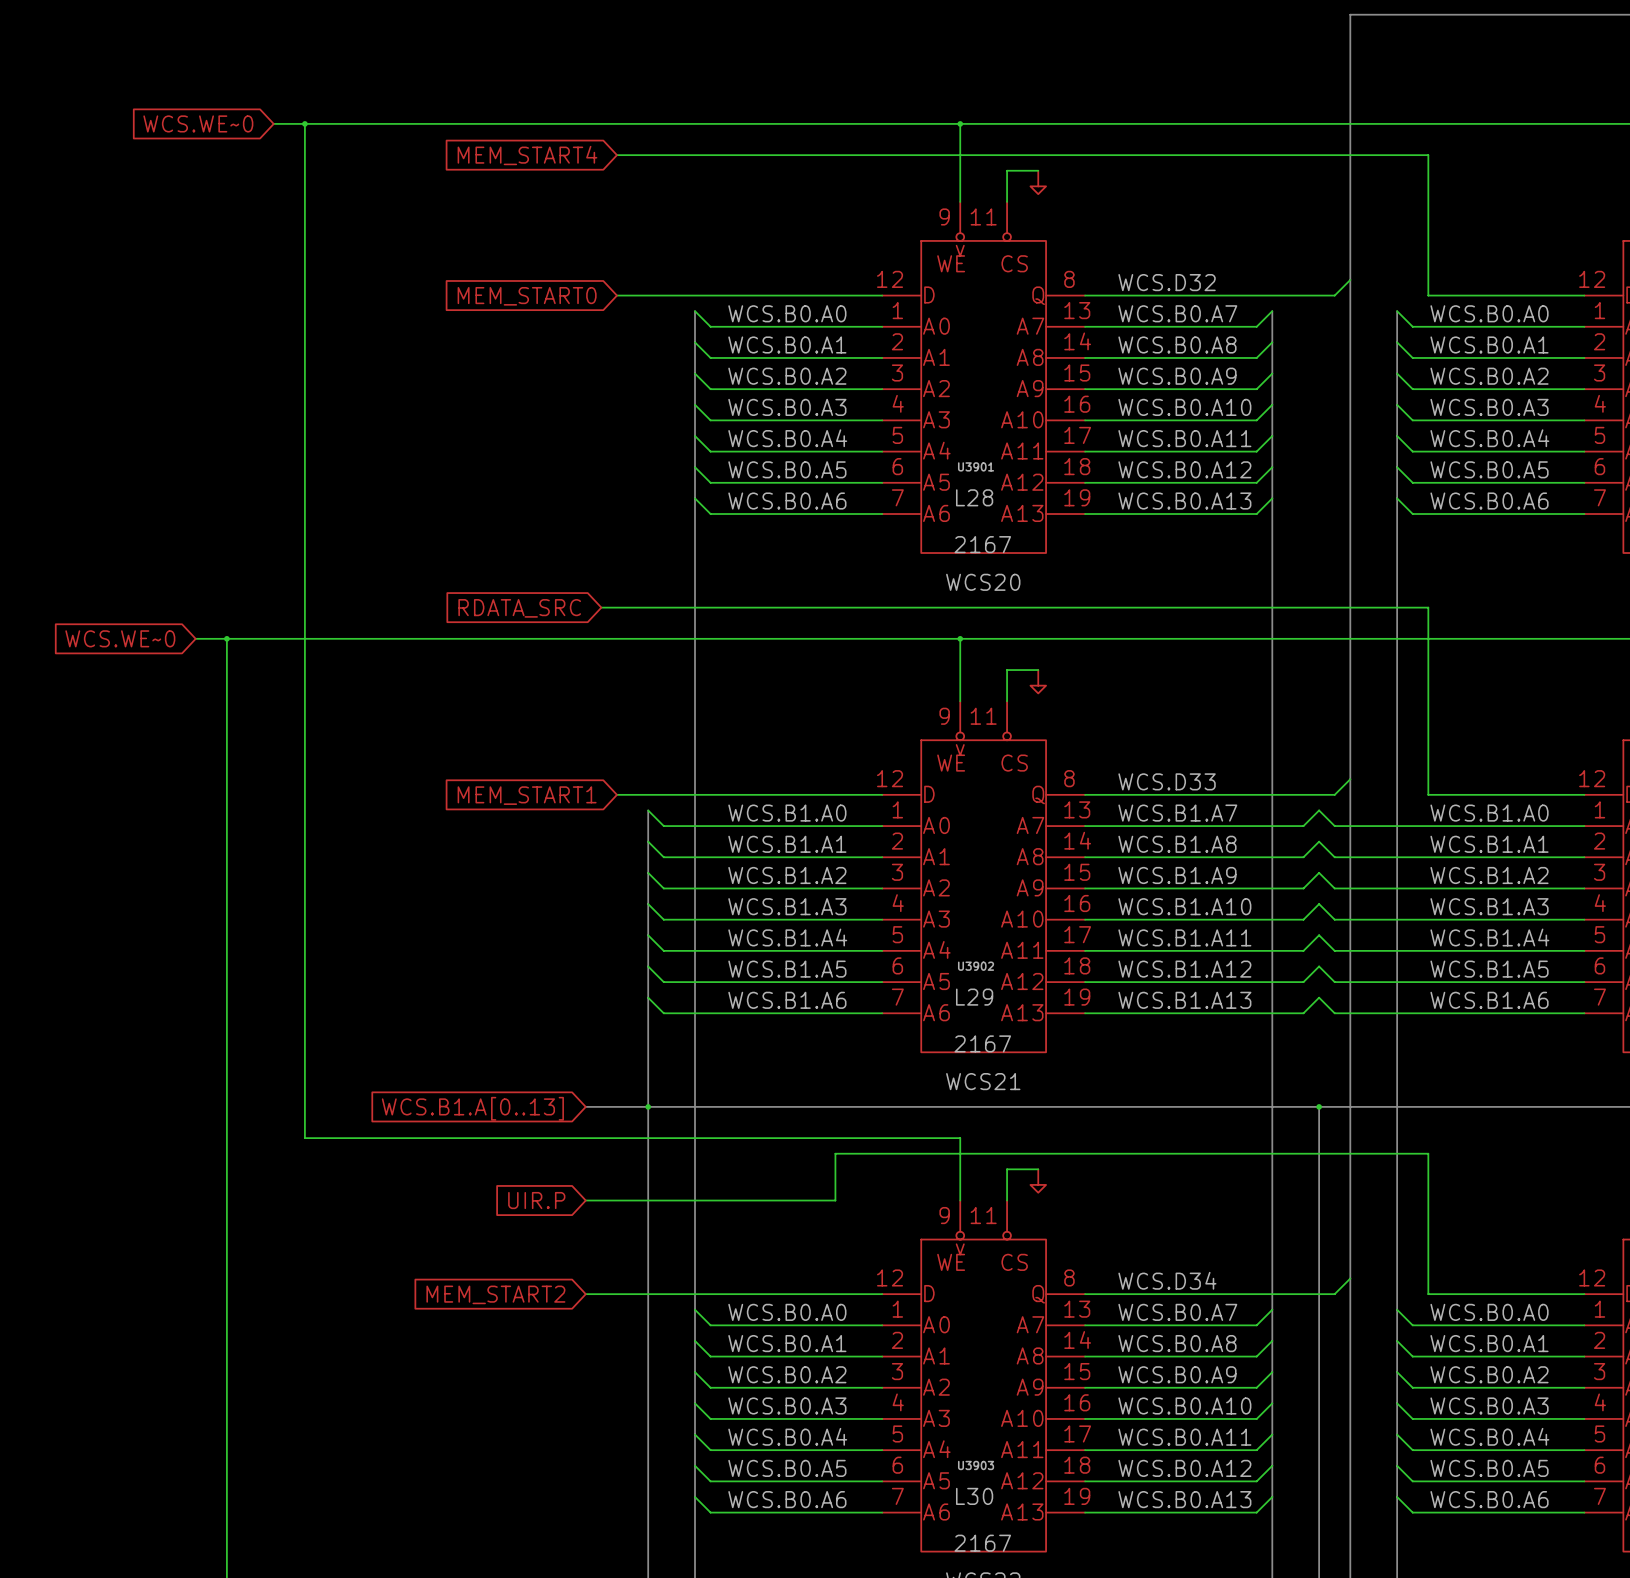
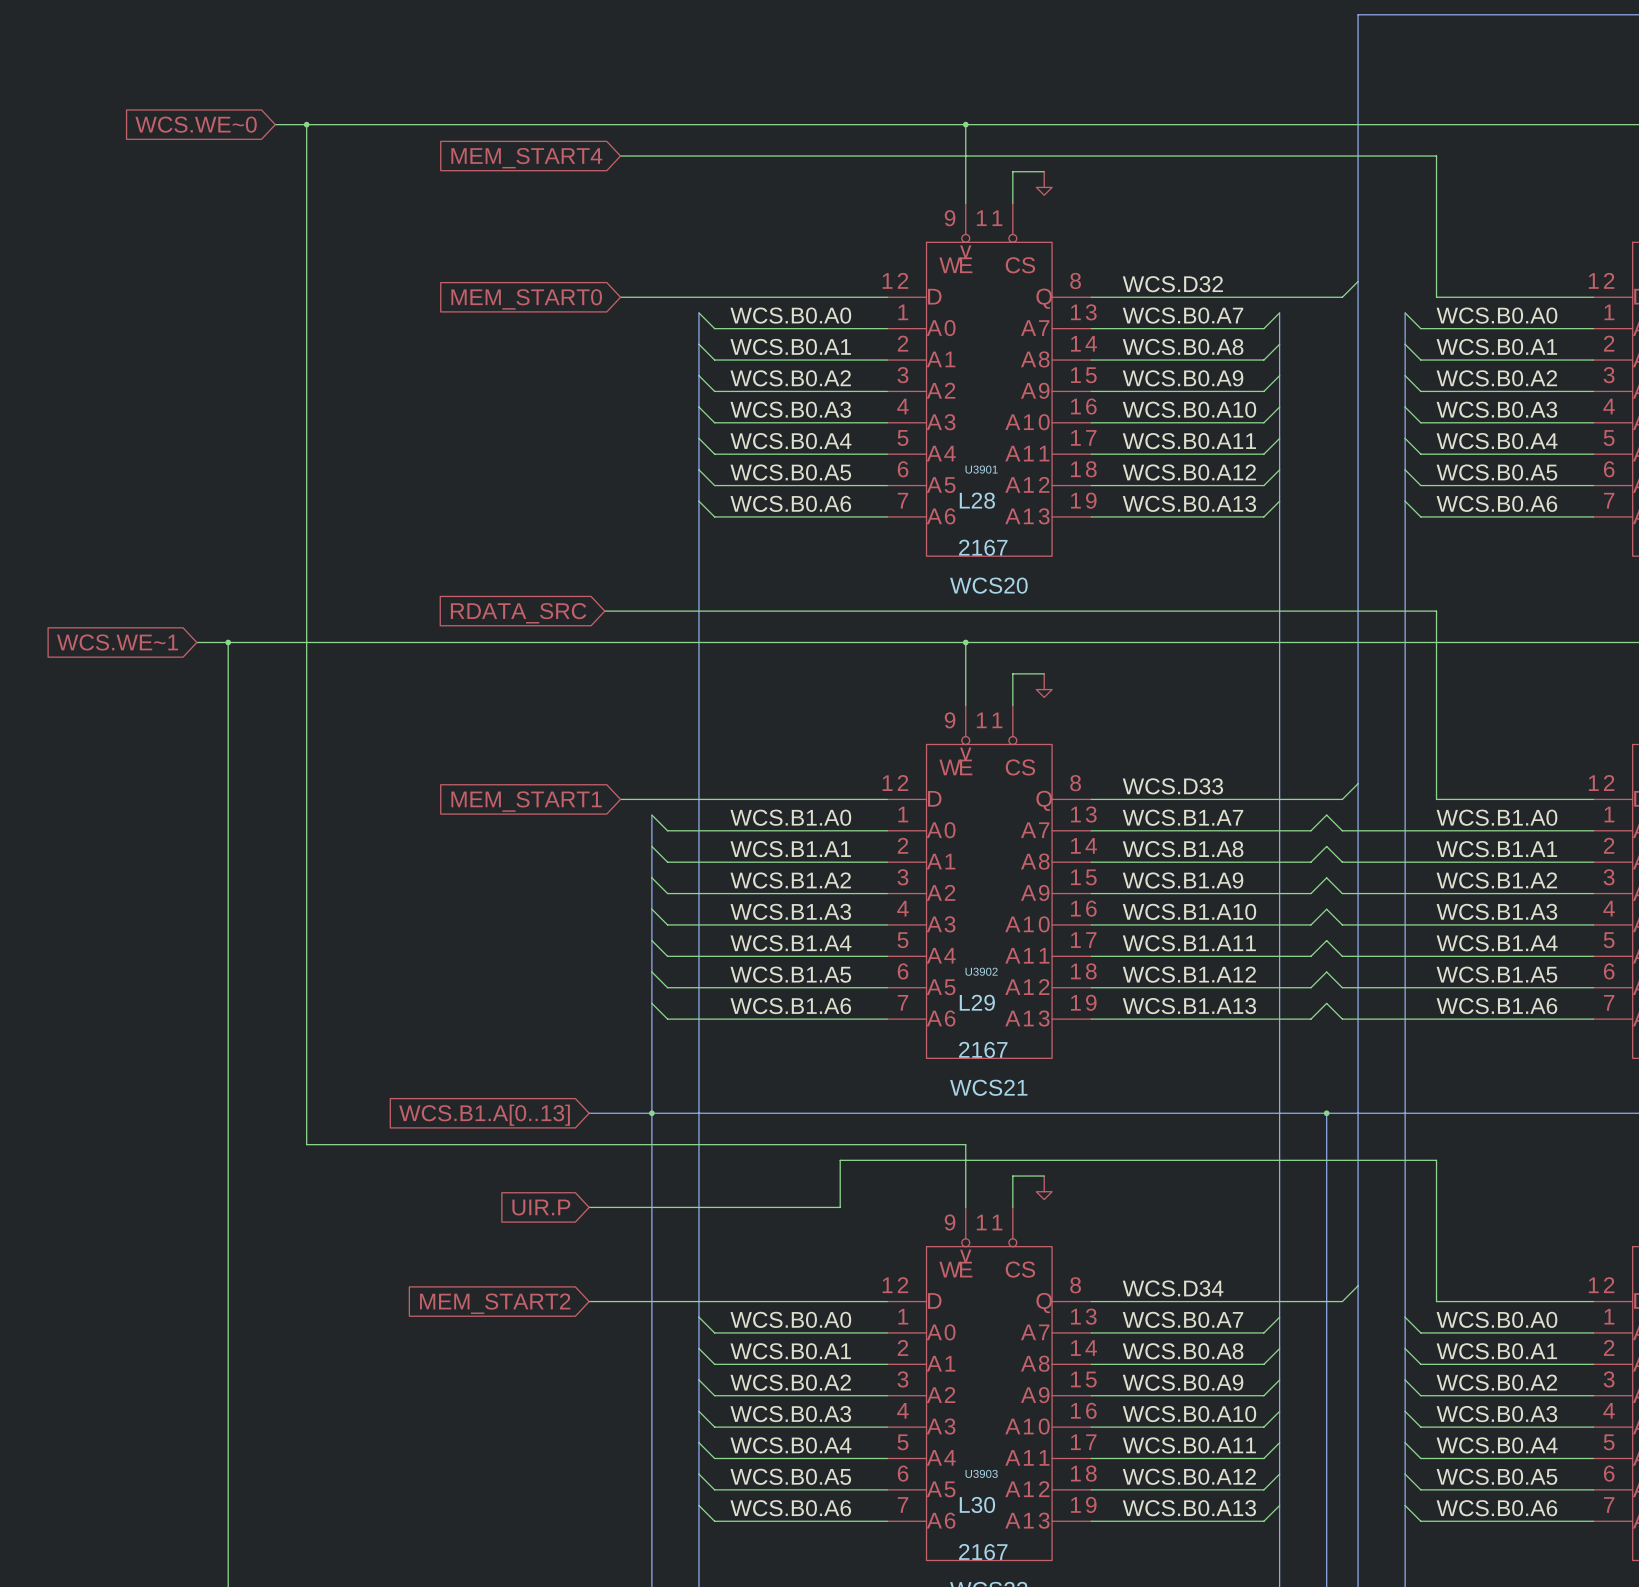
global label: WCS.WE~0 (120, 638) -> WCS.WE~1 (117, 642)

